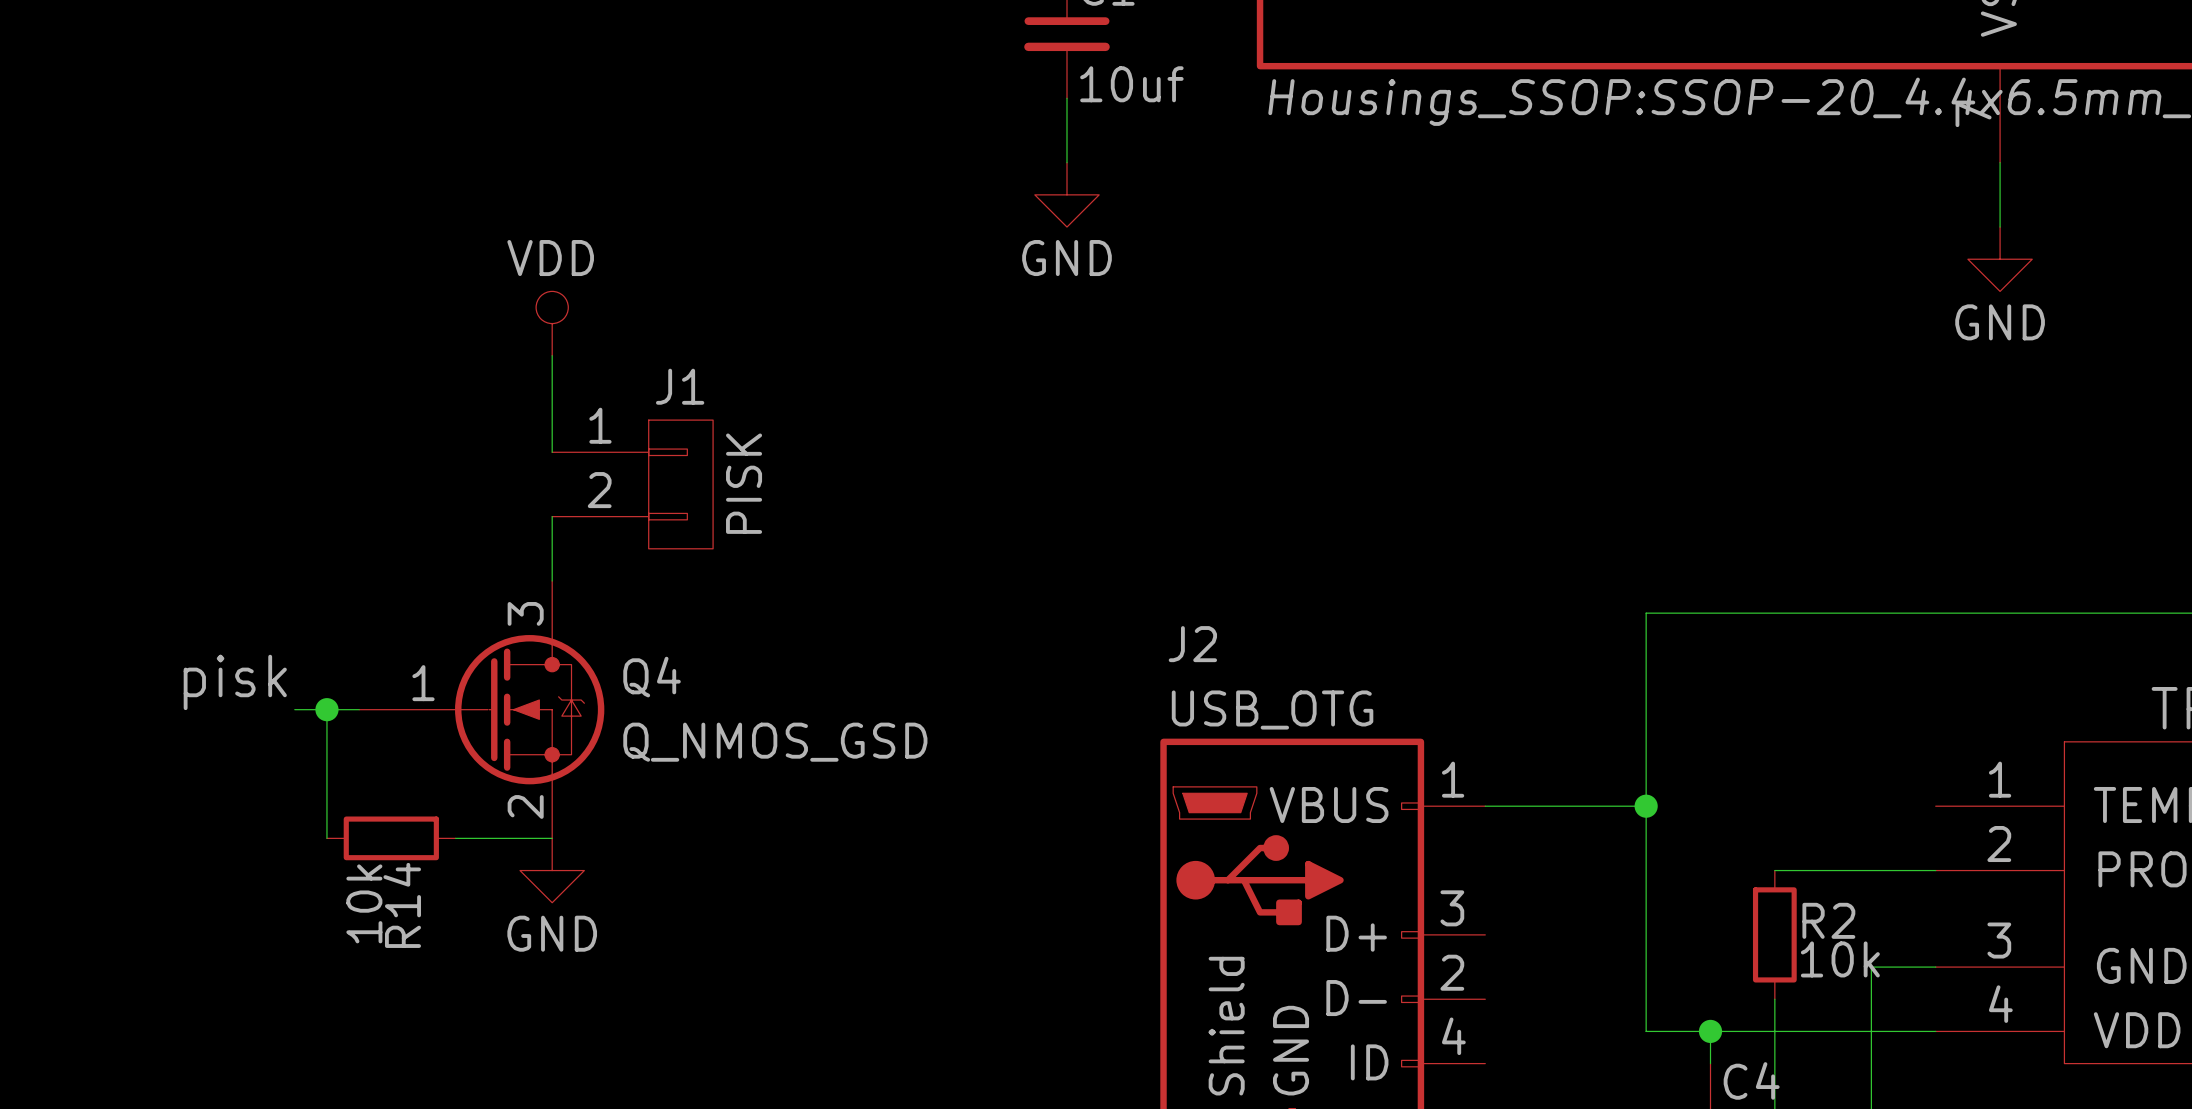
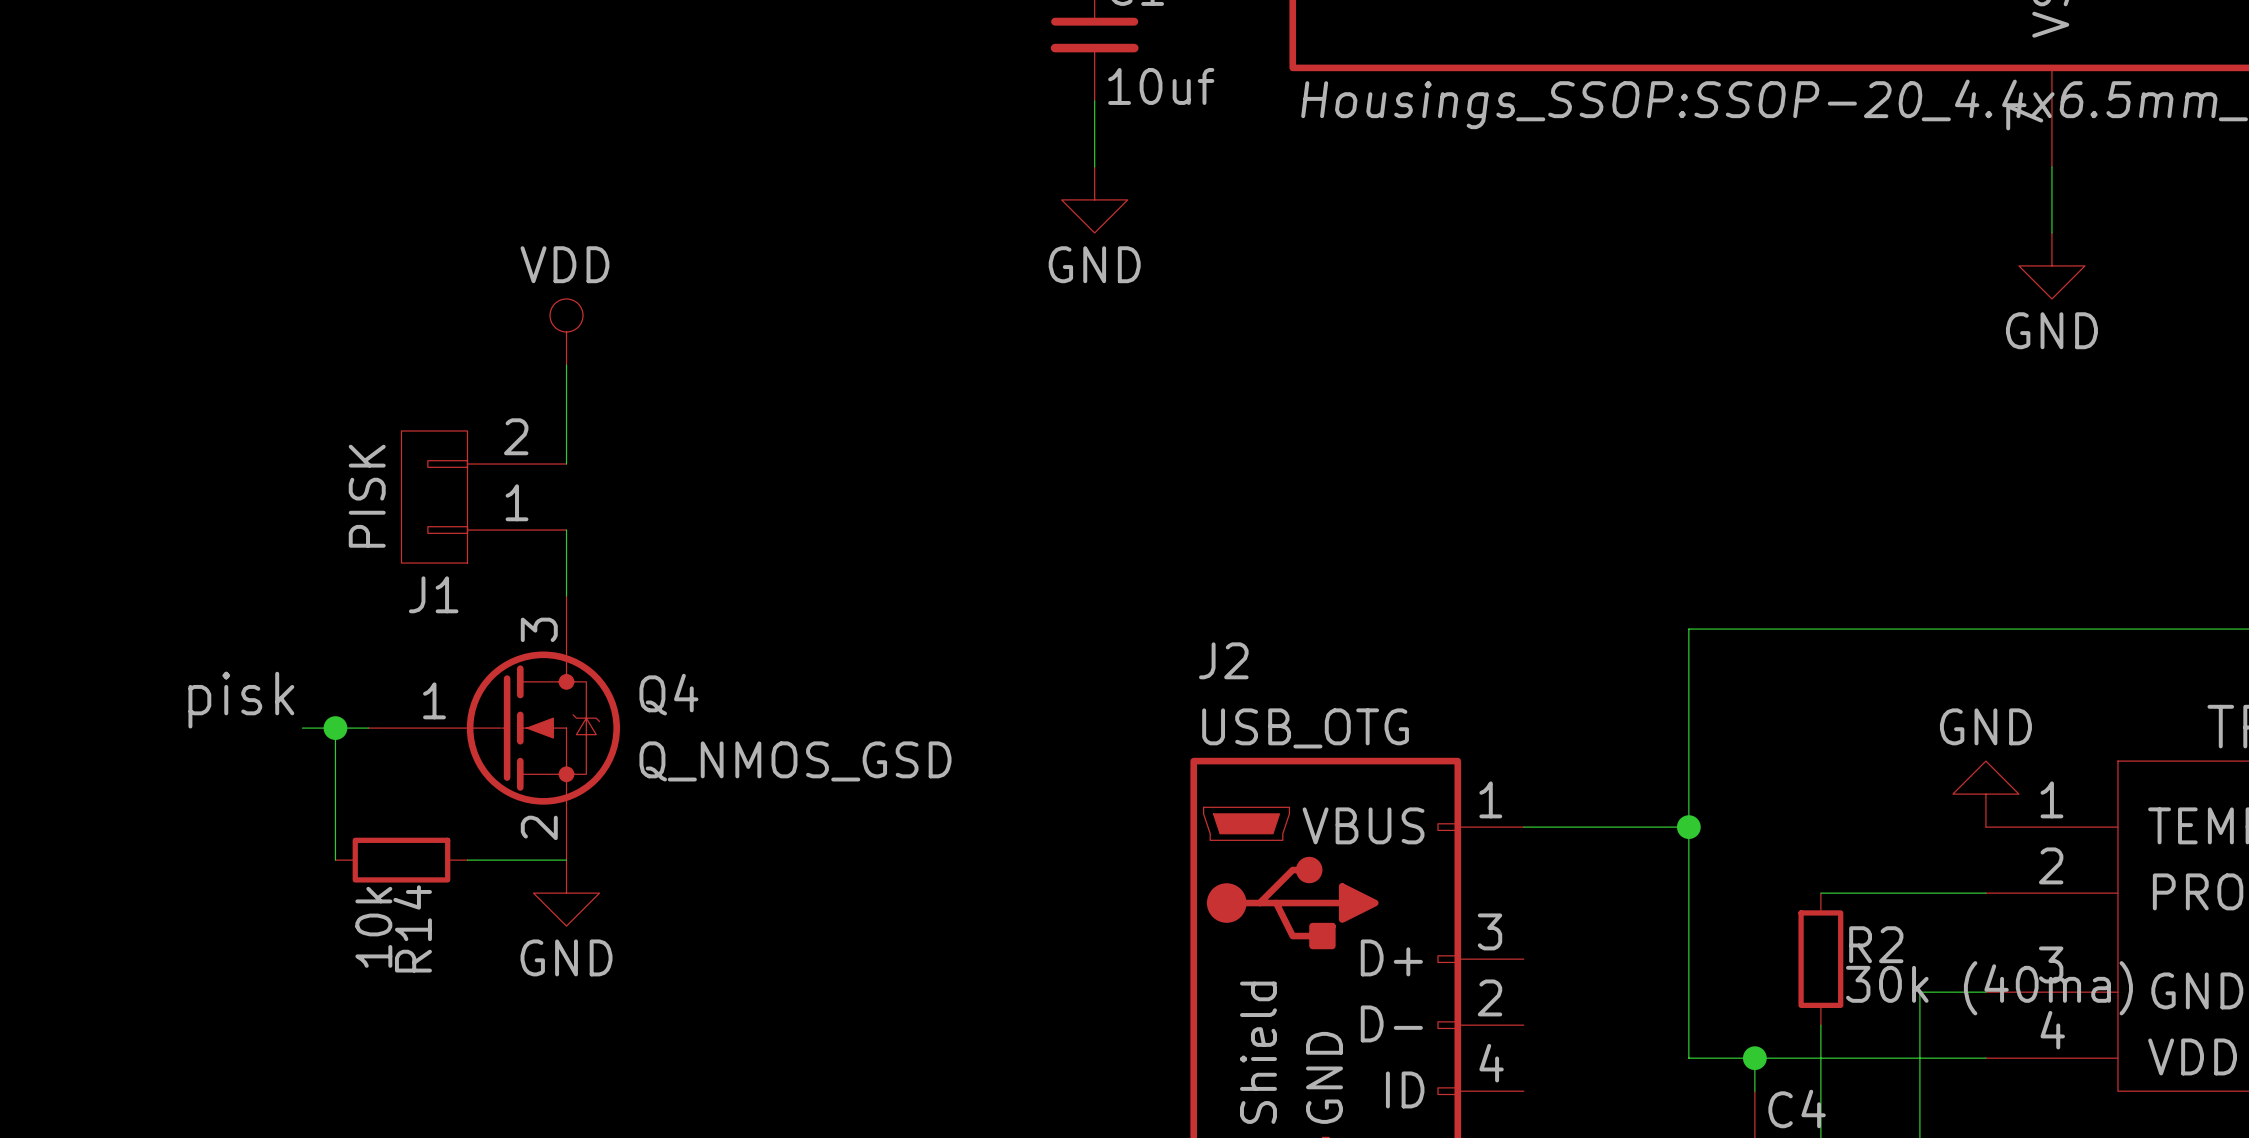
J1 position: (632, 484) -> (483, 497)
J1 rotation: 0° (680, 484) -> 180° (434, 497)
power symbol: none -> GND (1985, 794)
R2 value: 10k (1840, 959) -> 30k (40ma) (1989, 988)

